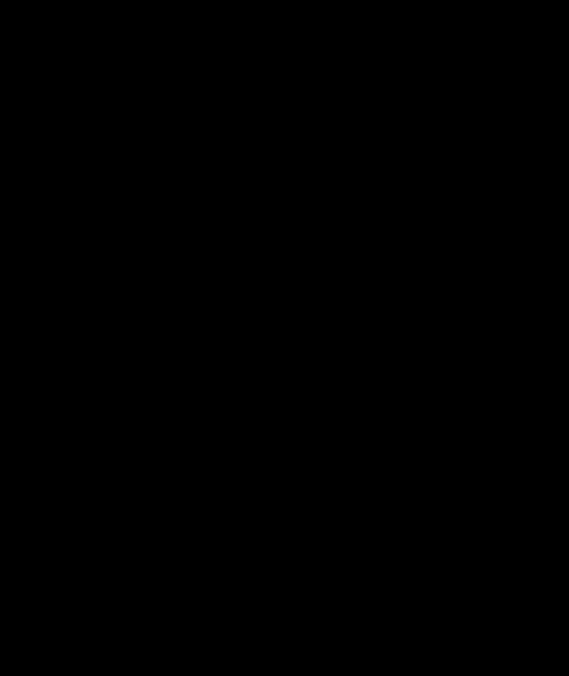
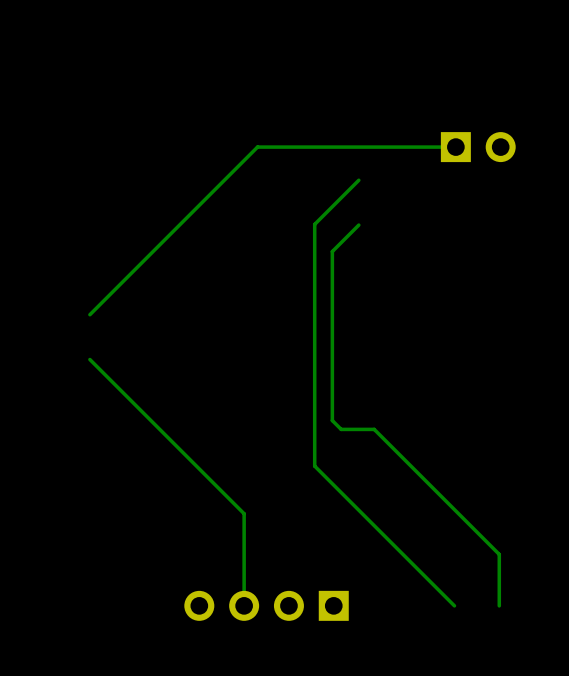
track: none -> (455, 147) (257, 147) (89, 314)
part: none -> (478, 147)
track: none -> (358, 180) (314, 224) (314, 466) (454, 605)
track: none -> (358, 225) (332, 251) (332, 420) (341, 429) (374, 429) (499, 554) (499, 605)
track: none -> (89, 359) (244, 513) (244, 605)
part: none -> (266, 605)

